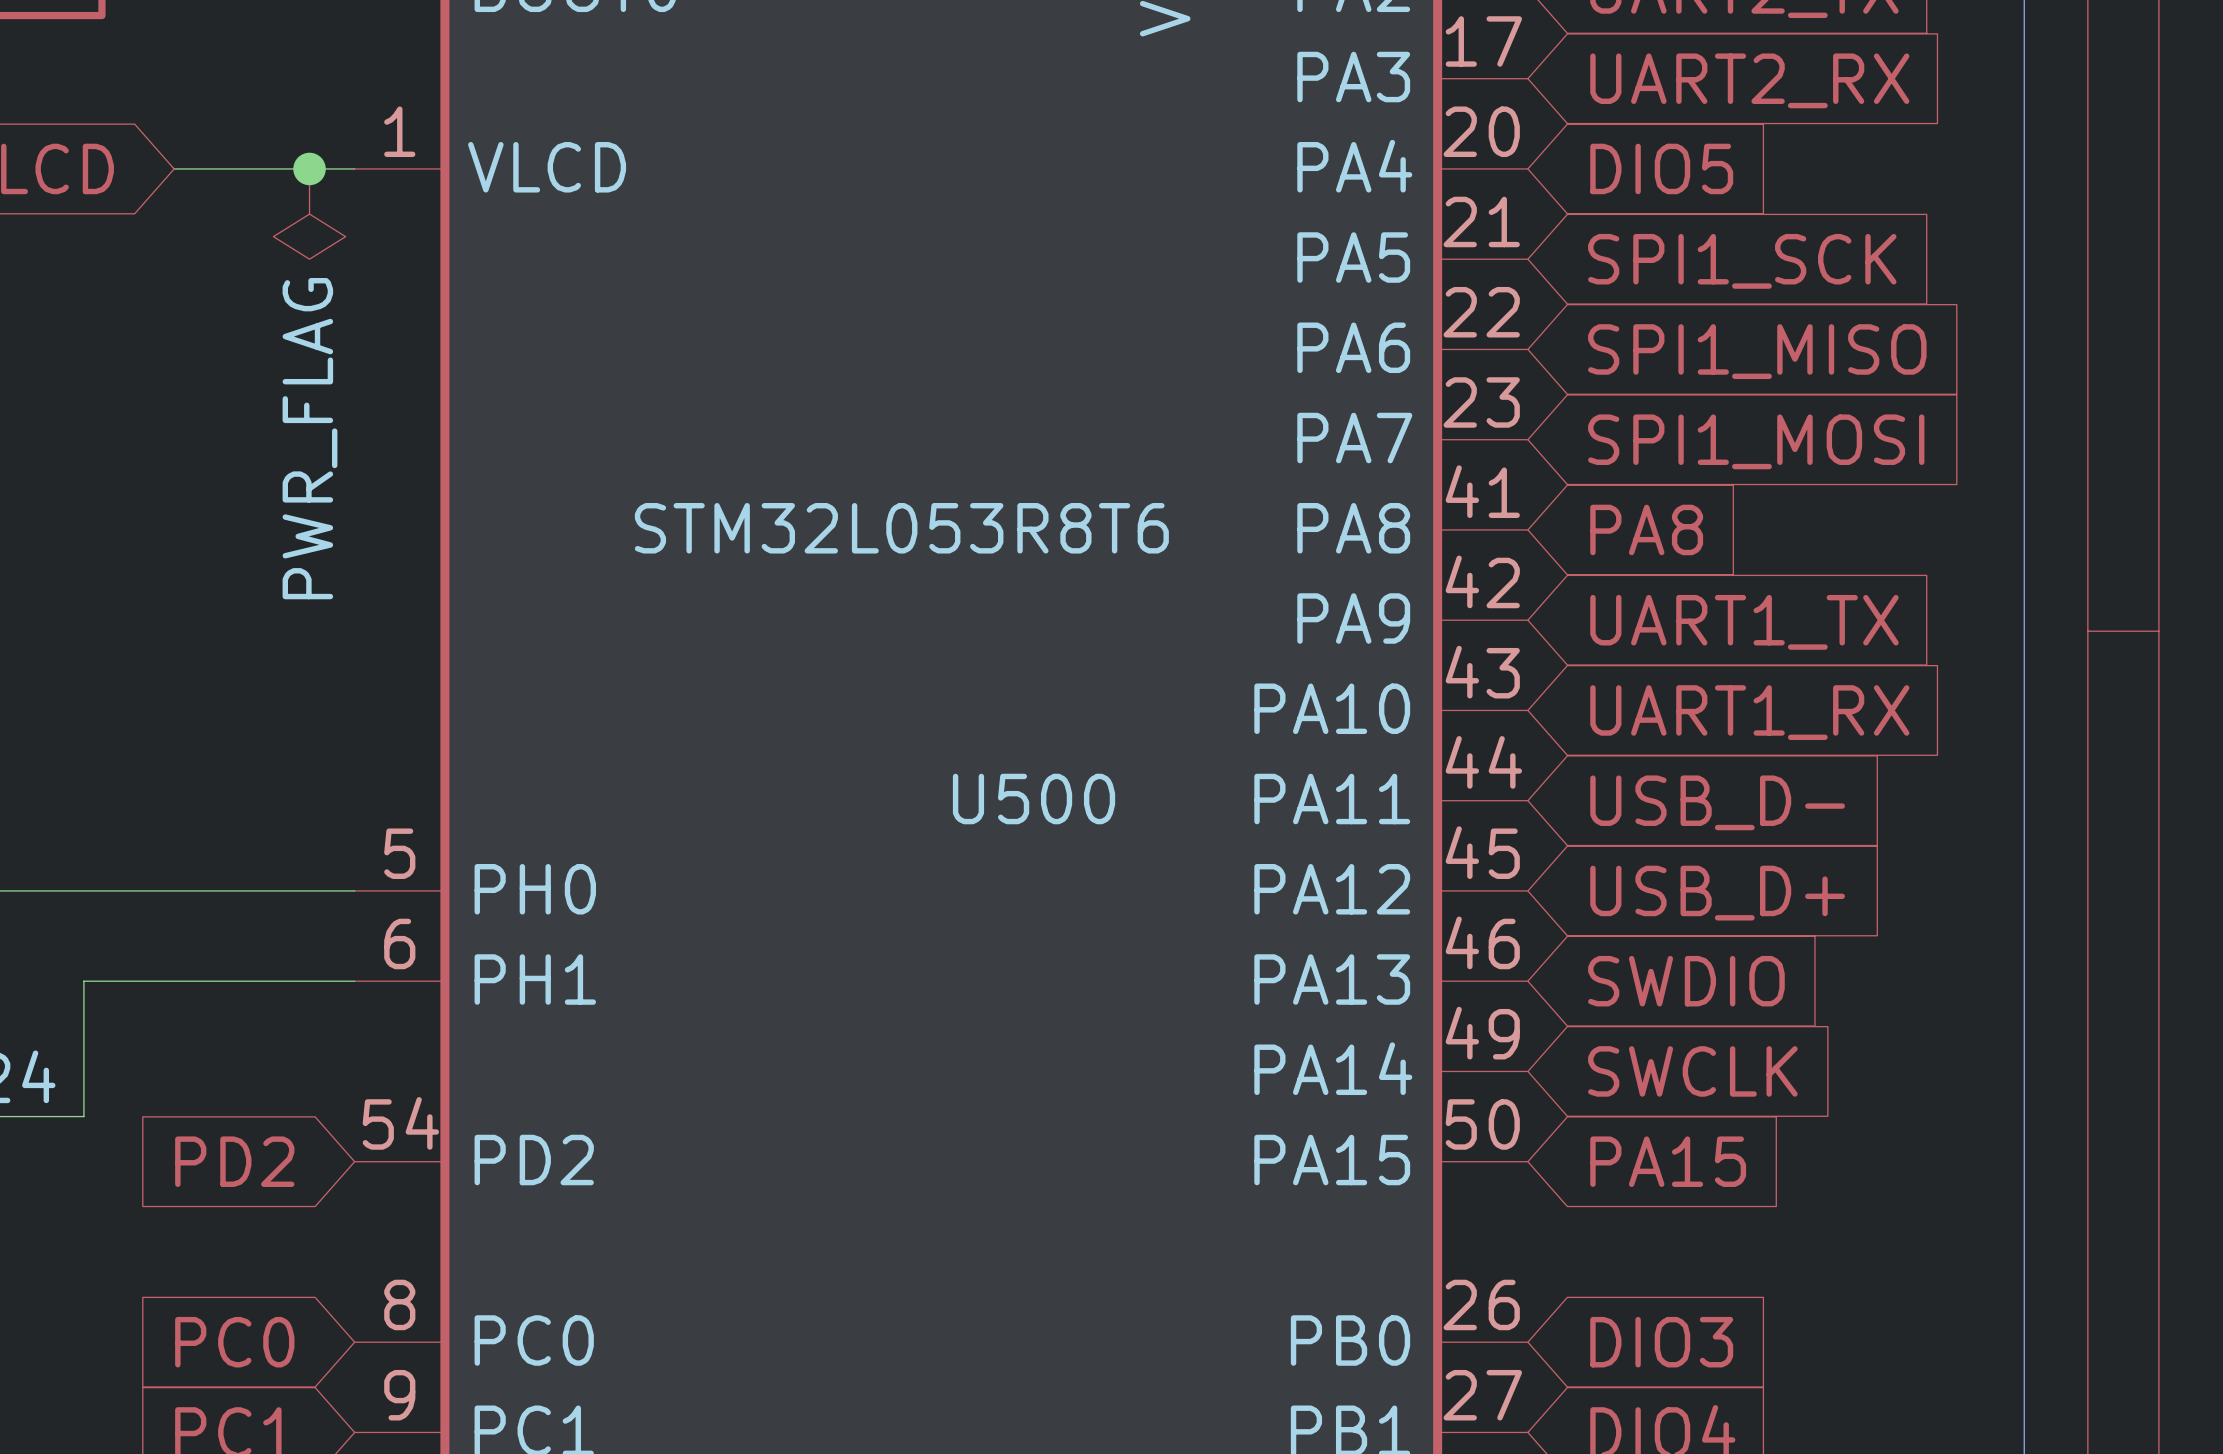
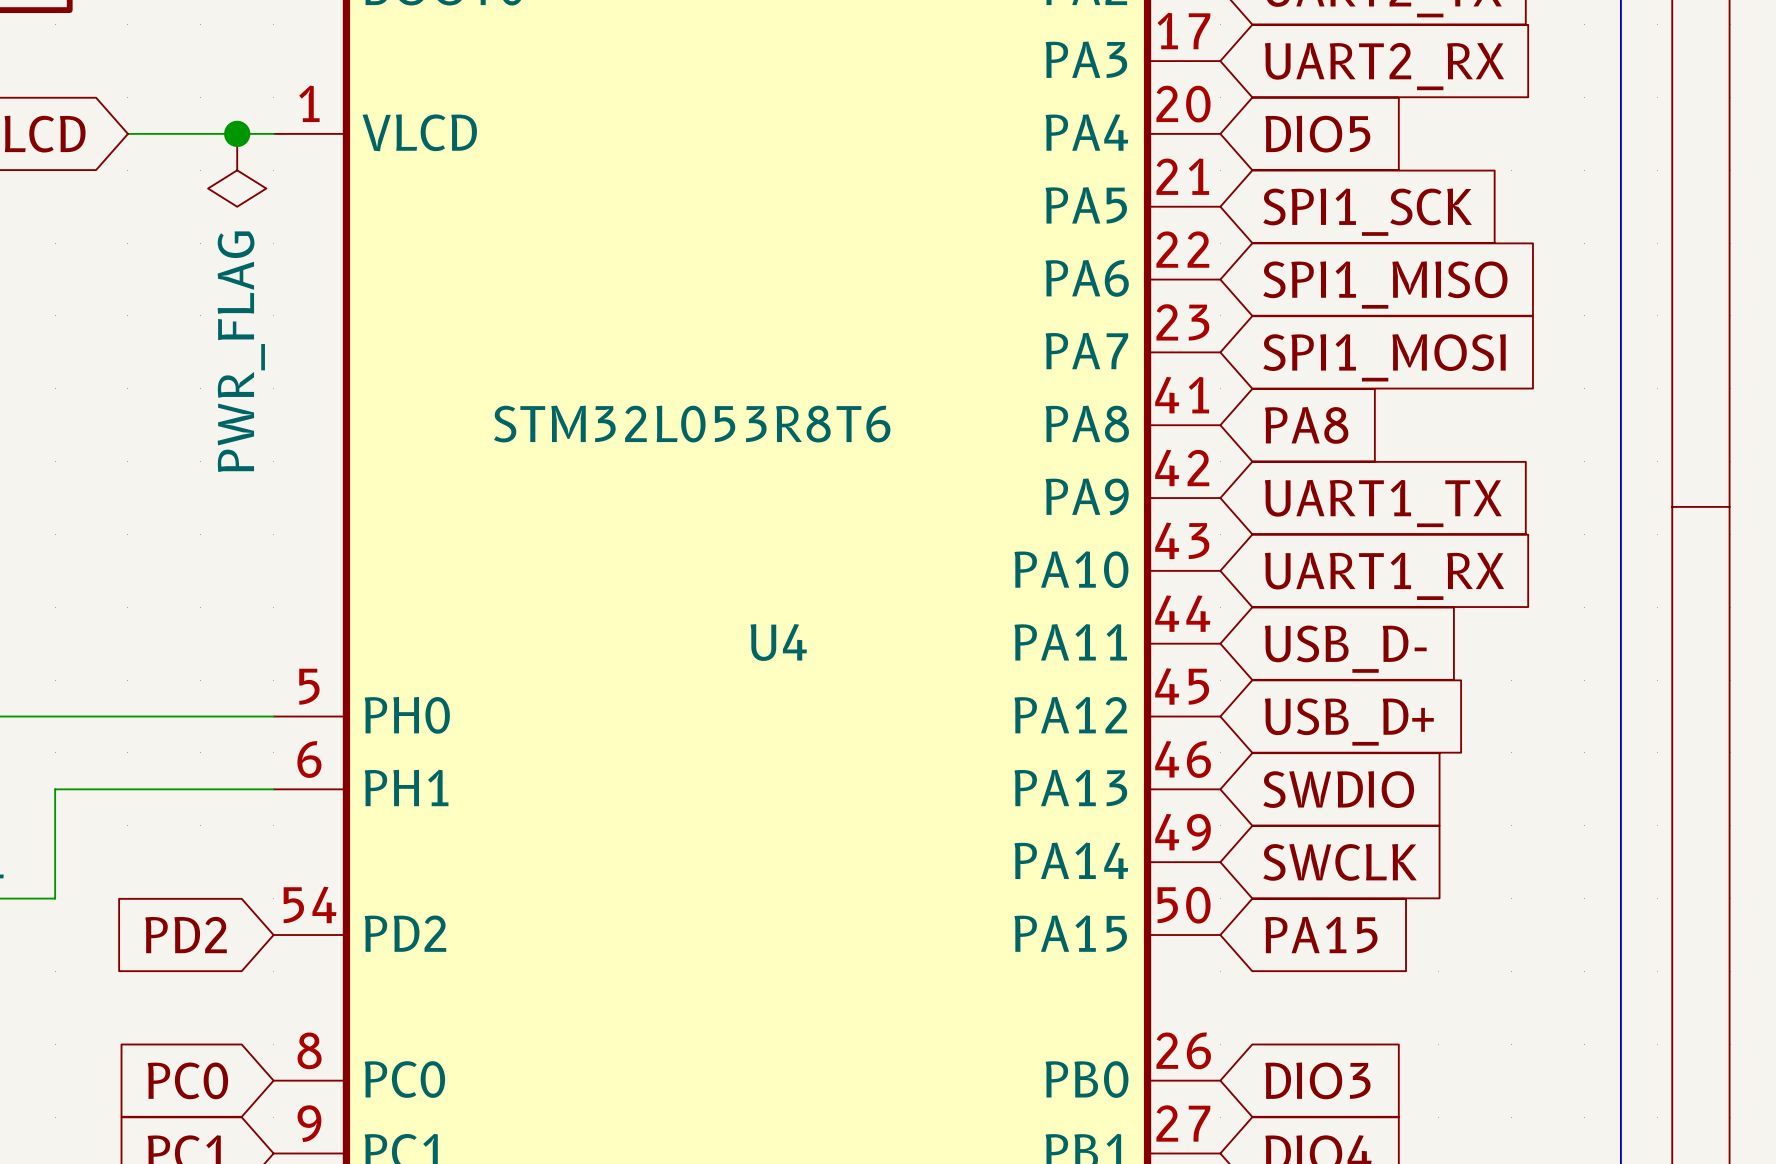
U500 name: U500 (1034, 799) -> U4 (778, 642)

